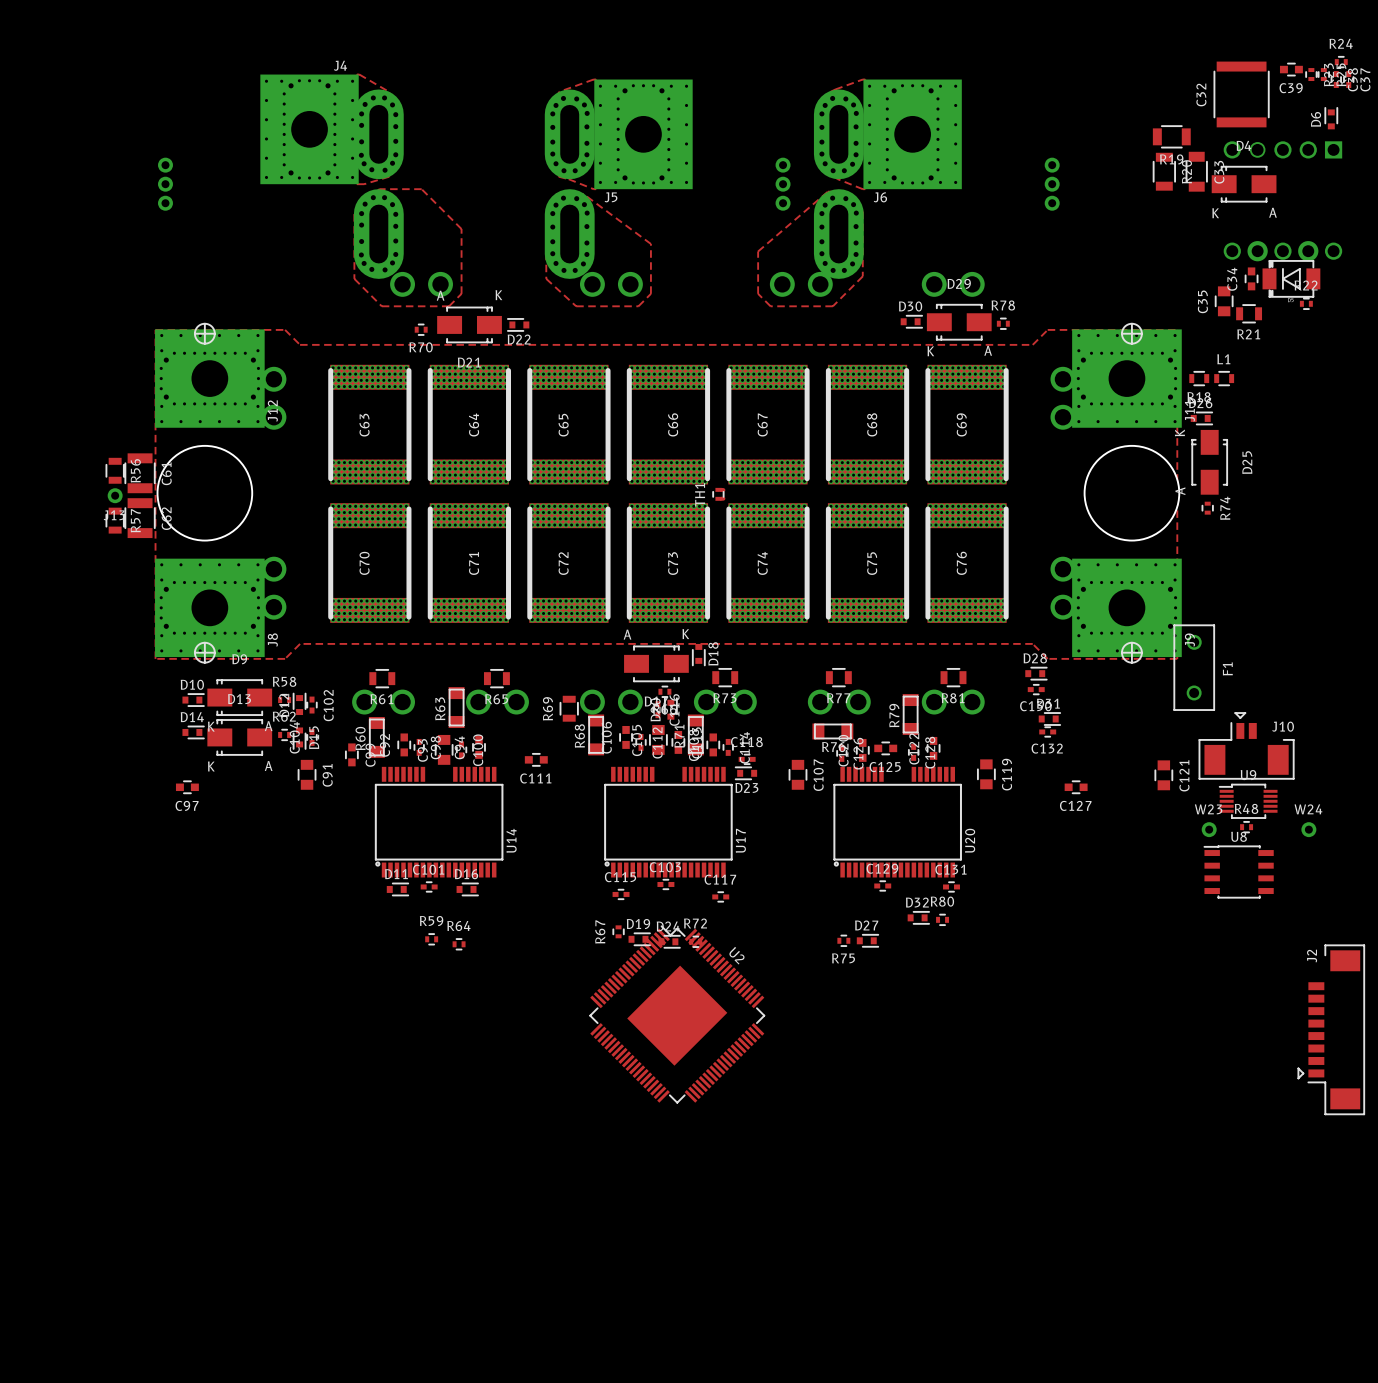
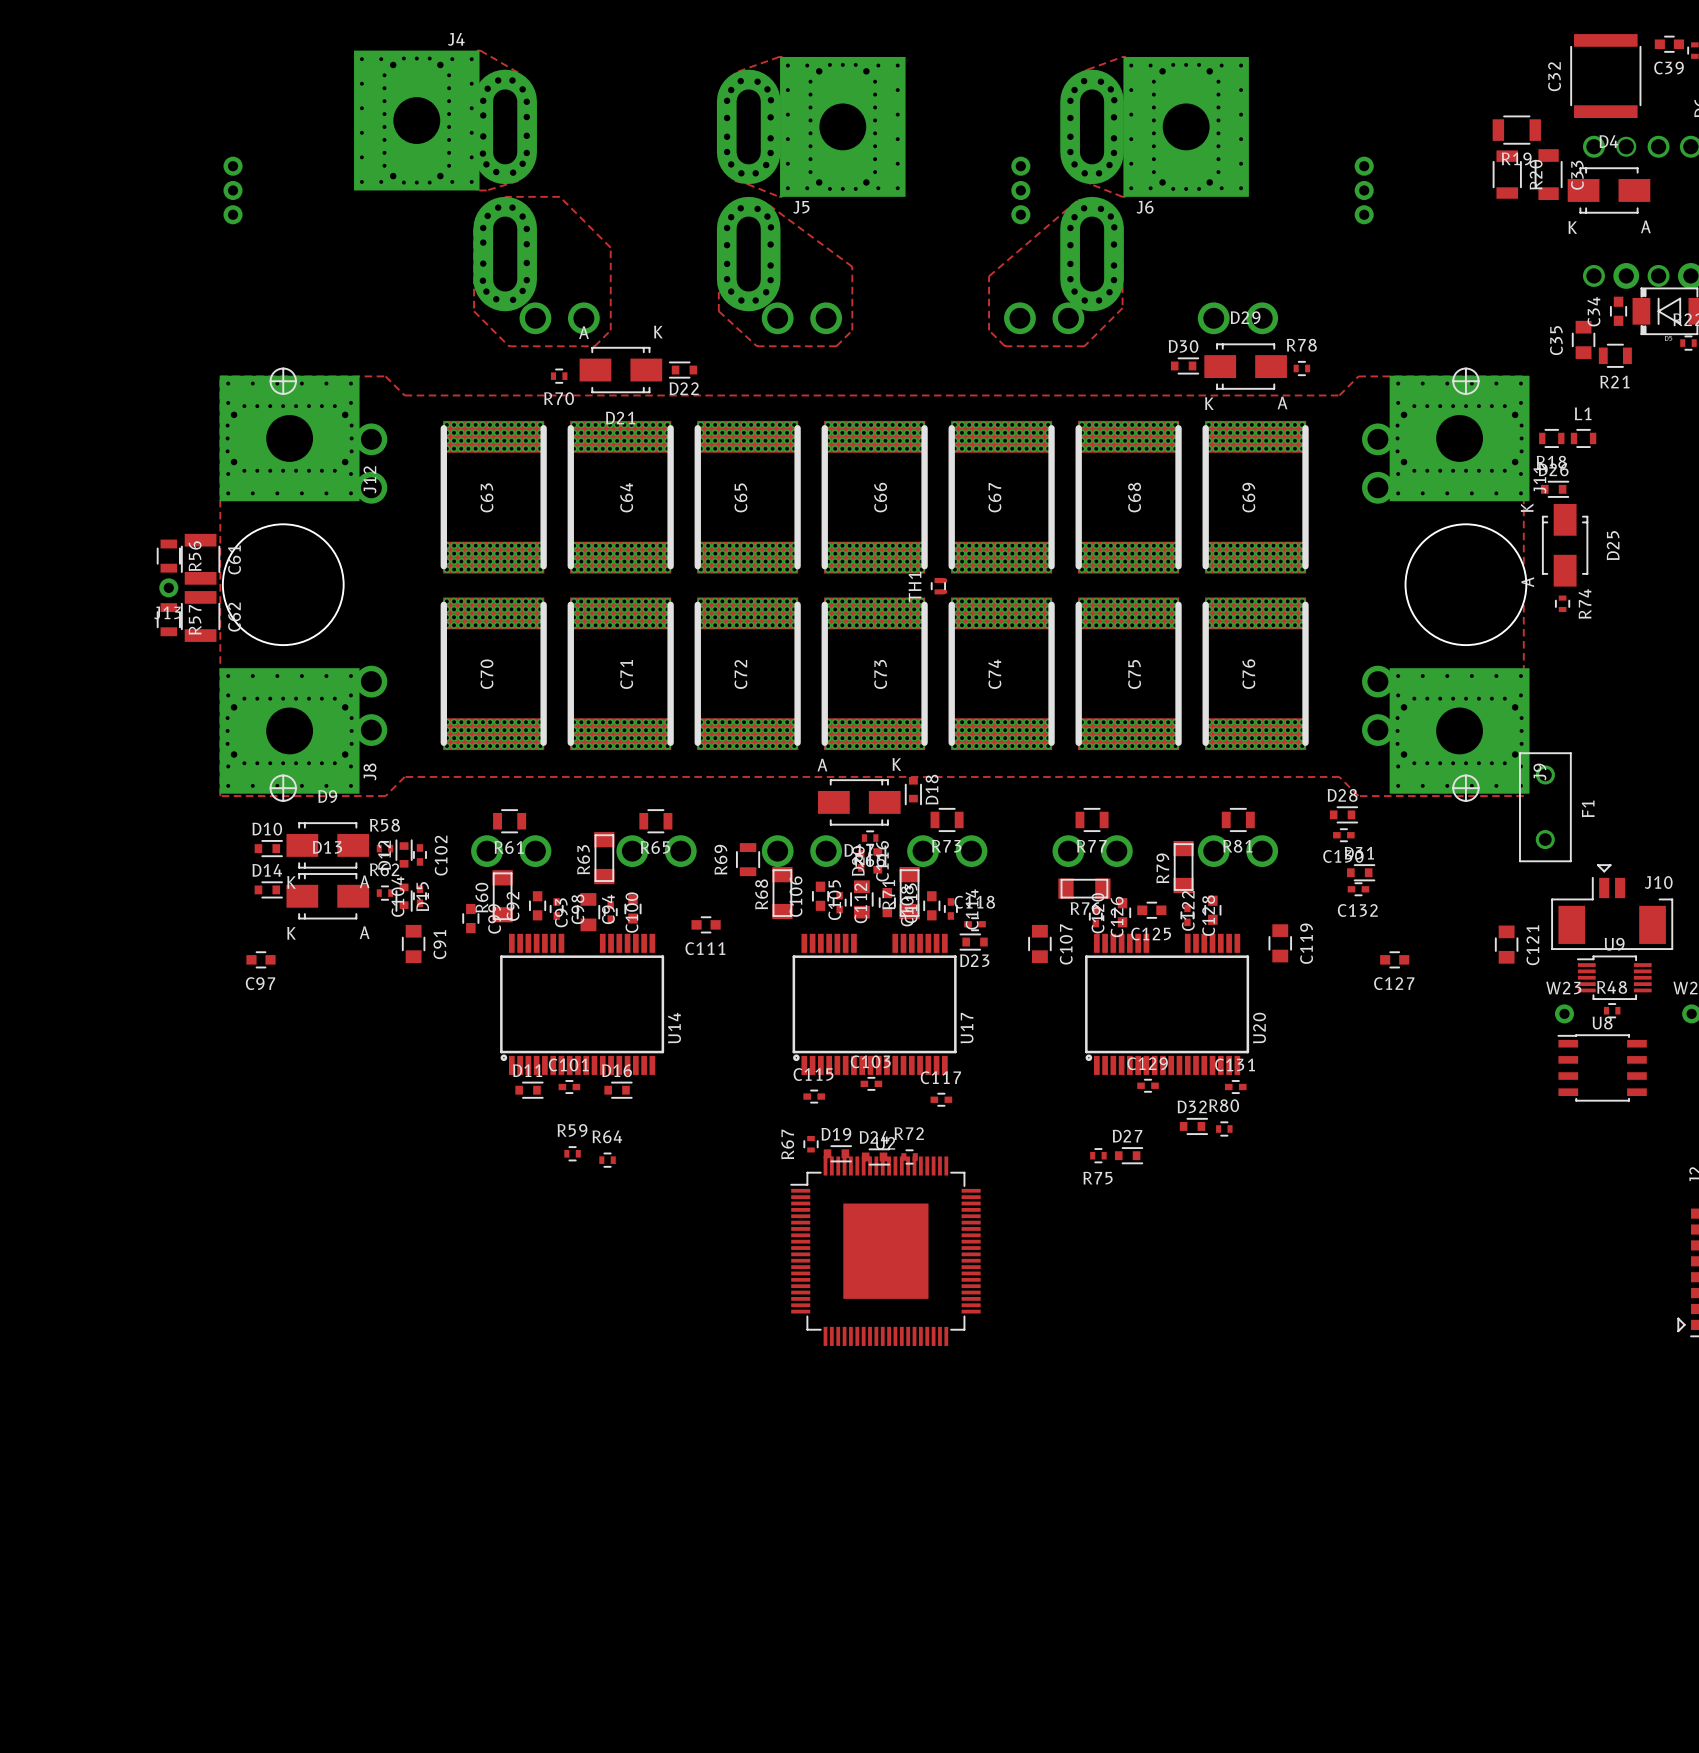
U2 rotation: 0° (677, 1014) -> 45° counterclockwise (885, 1251)

